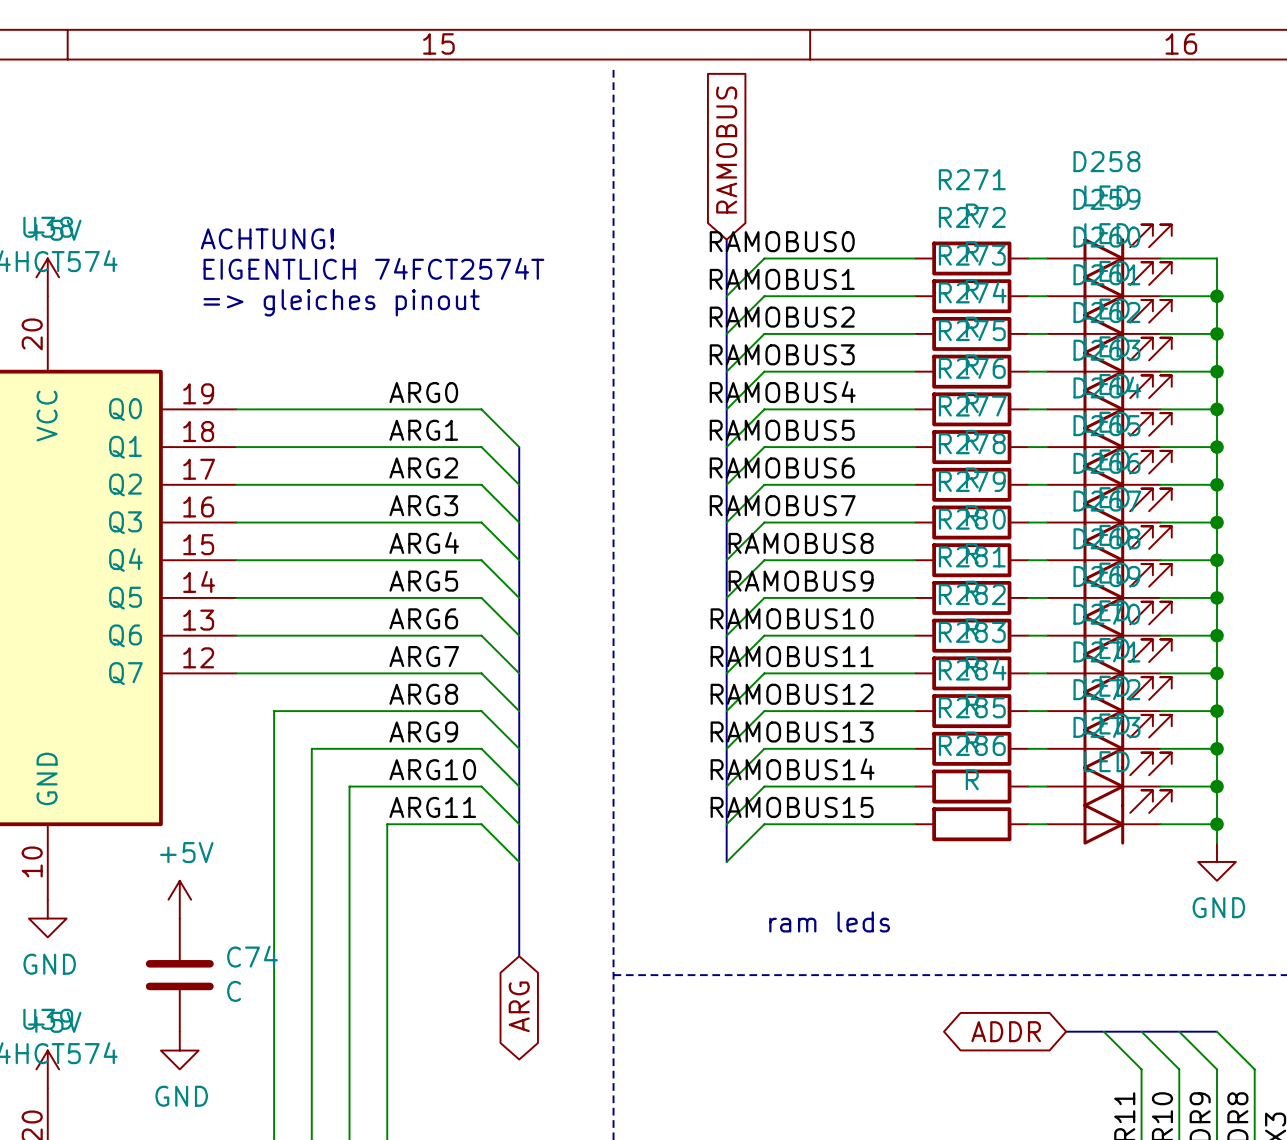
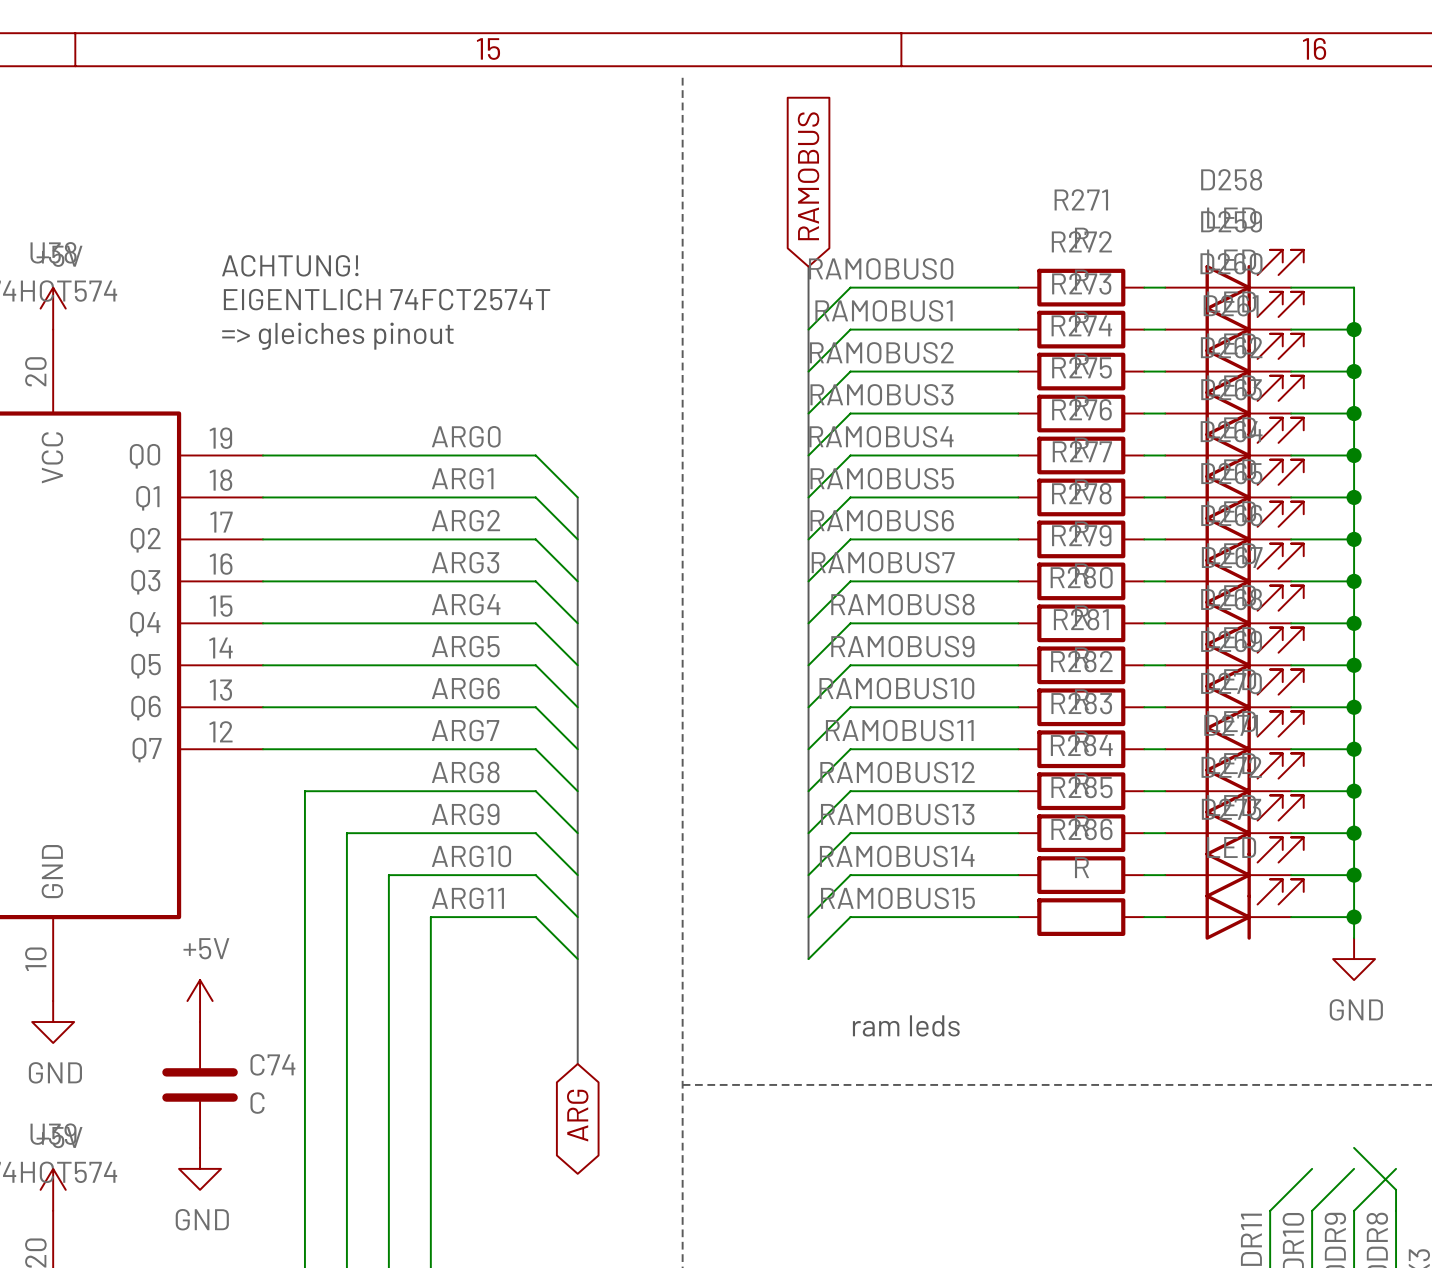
global label: ADDR (1006, 1031) -> none
bus: (1066, 1031) (1216, 1031) -> none
wire: (1103, 1031) (1141, 1069) (1141, 1088) -> (1312, 1168) (1270, 1210)
wire: (1141, 1031) (1179, 1069) (1179, 1088) -> (1354, 1168) (1312, 1210)
wire: (1179, 1031) (1216, 1069) (1216, 1088) -> (1396, 1168) (1354, 1210)

